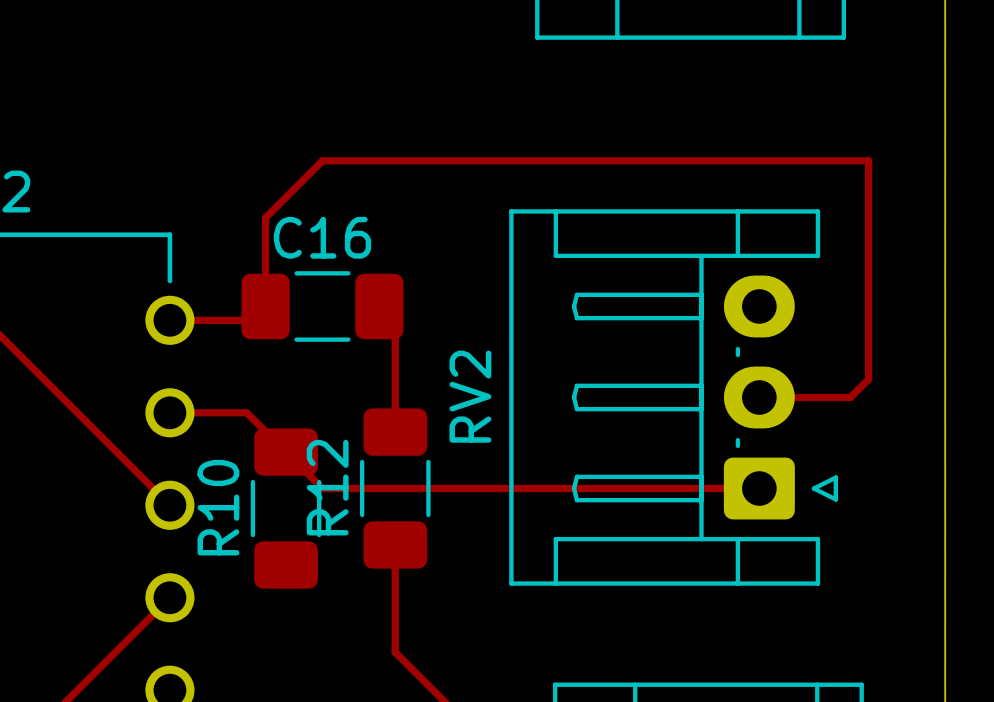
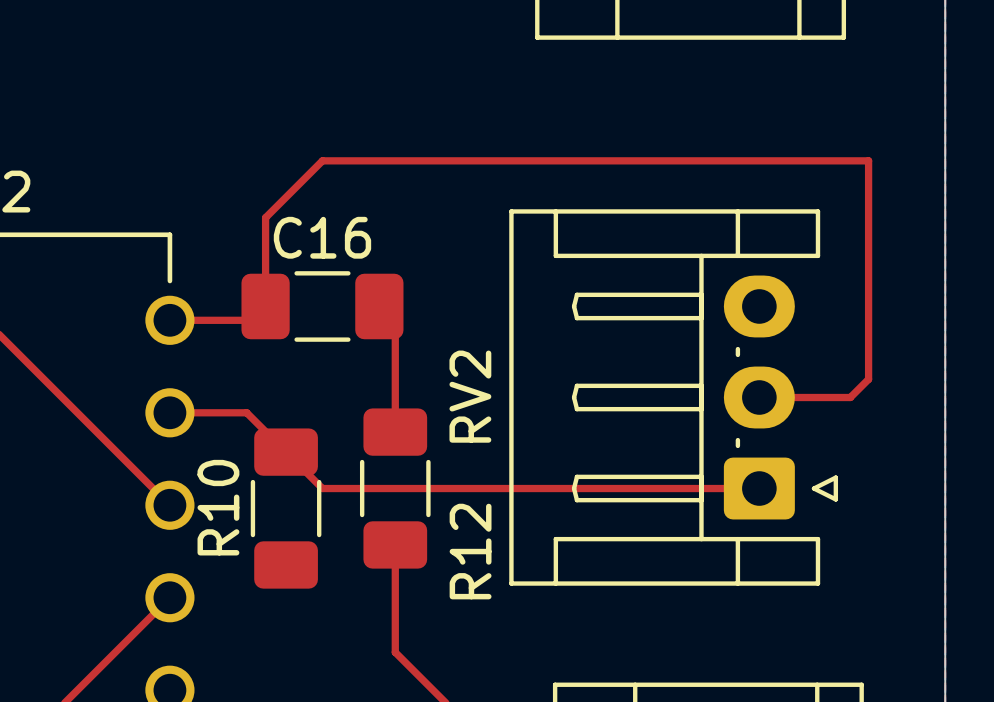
R12 name position: R12 (327, 487) -> R12 (470, 551)

